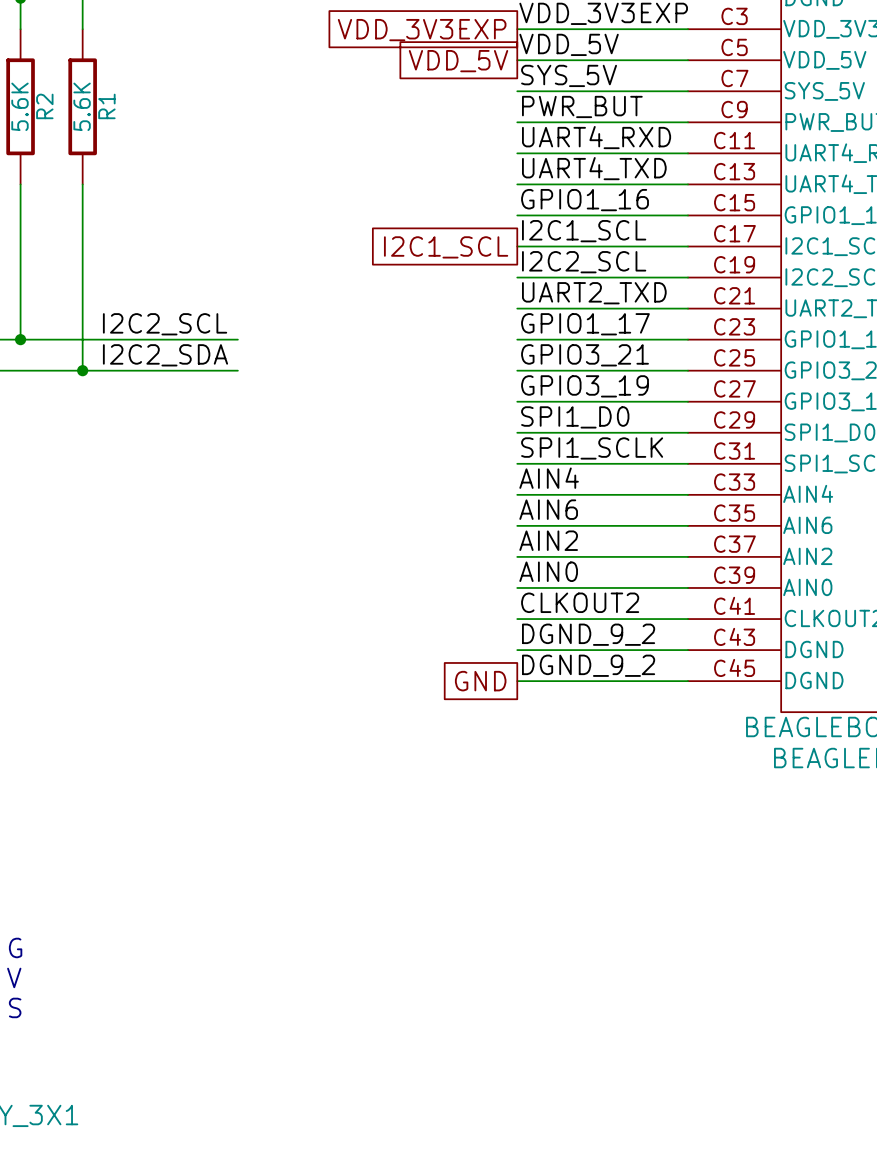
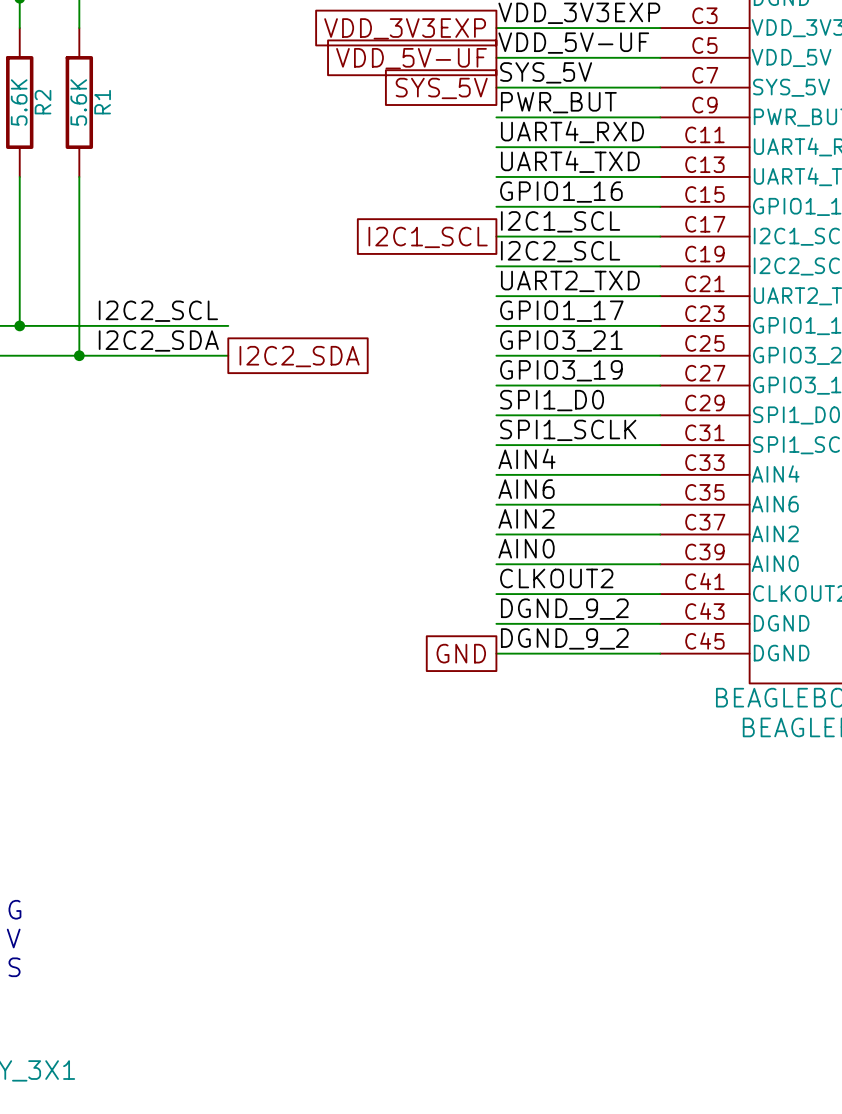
label: VDD_5V (569, 44) -> VDD_5V-UF (573, 43)
global label: VDD_5V (458, 61) -> VDD_5V-UF (411, 58)
global label: none -> SYS_5V (441, 88)
global label: none -> I2C2_SDA (299, 356)

